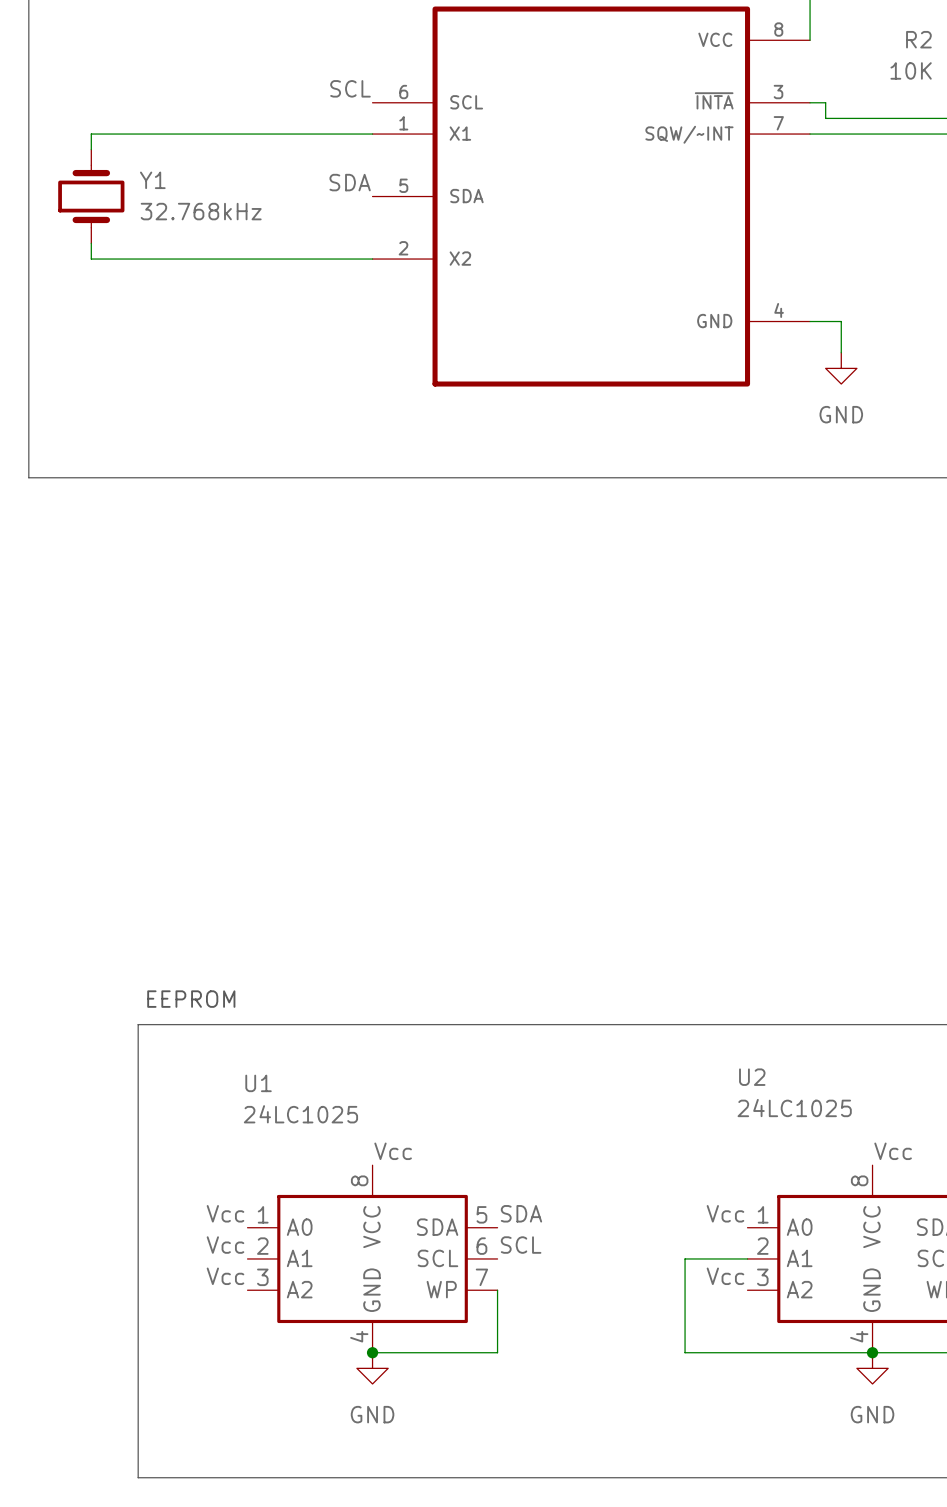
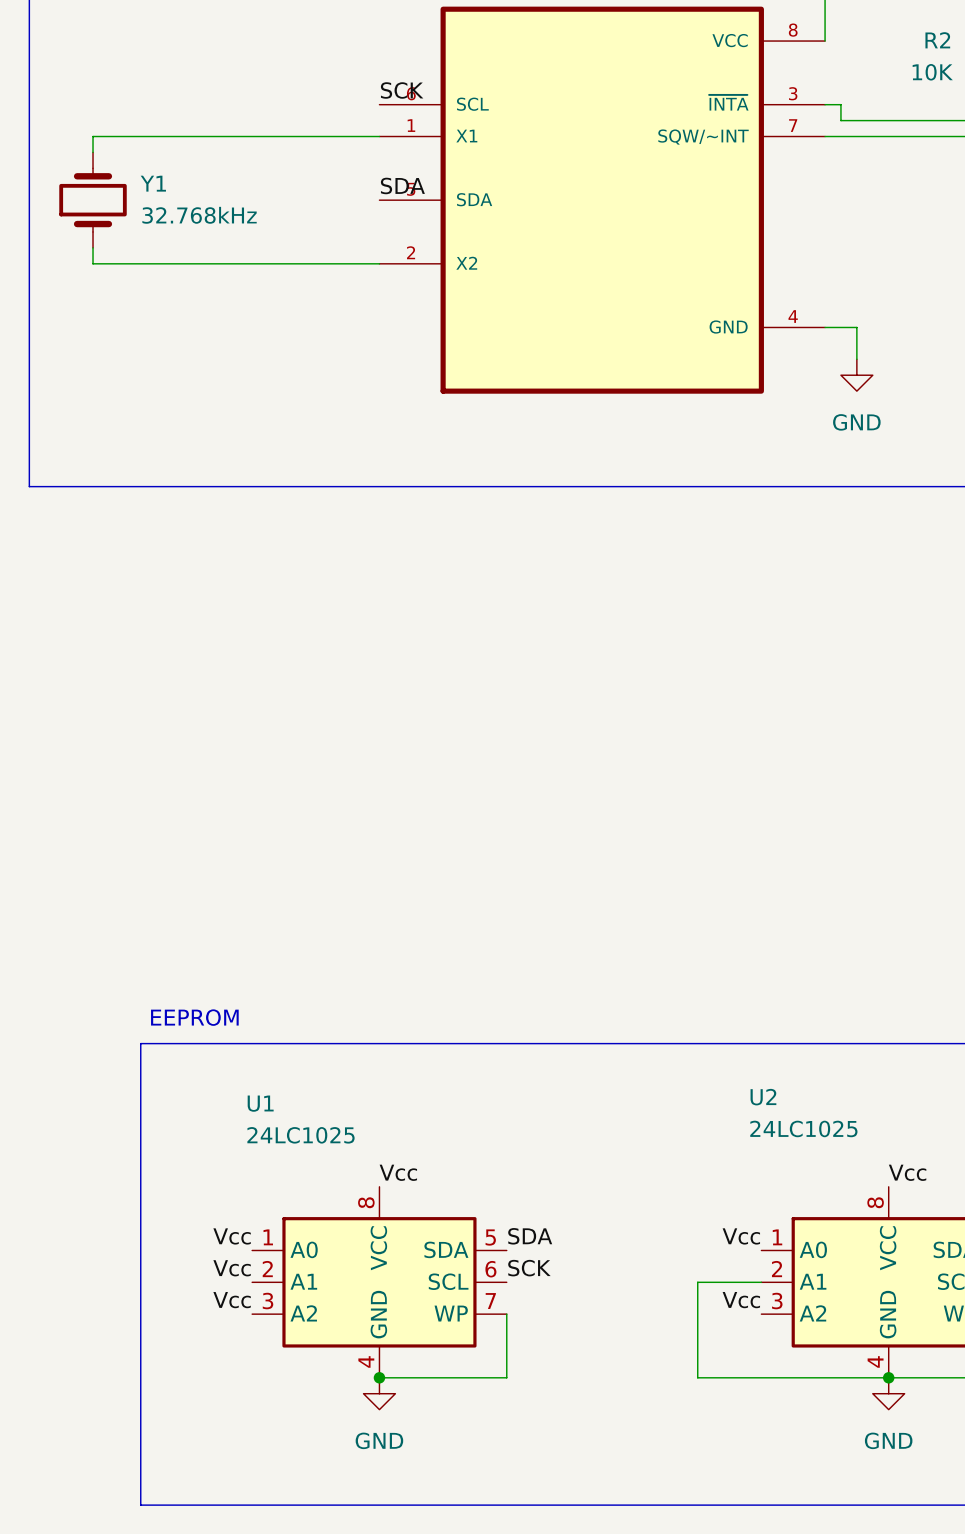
label: SCL (350, 88) -> SCK (402, 90)
label position: SDA (350, 182) -> SDA (402, 185)
label: SCL (521, 1245) -> SCK (529, 1268)

